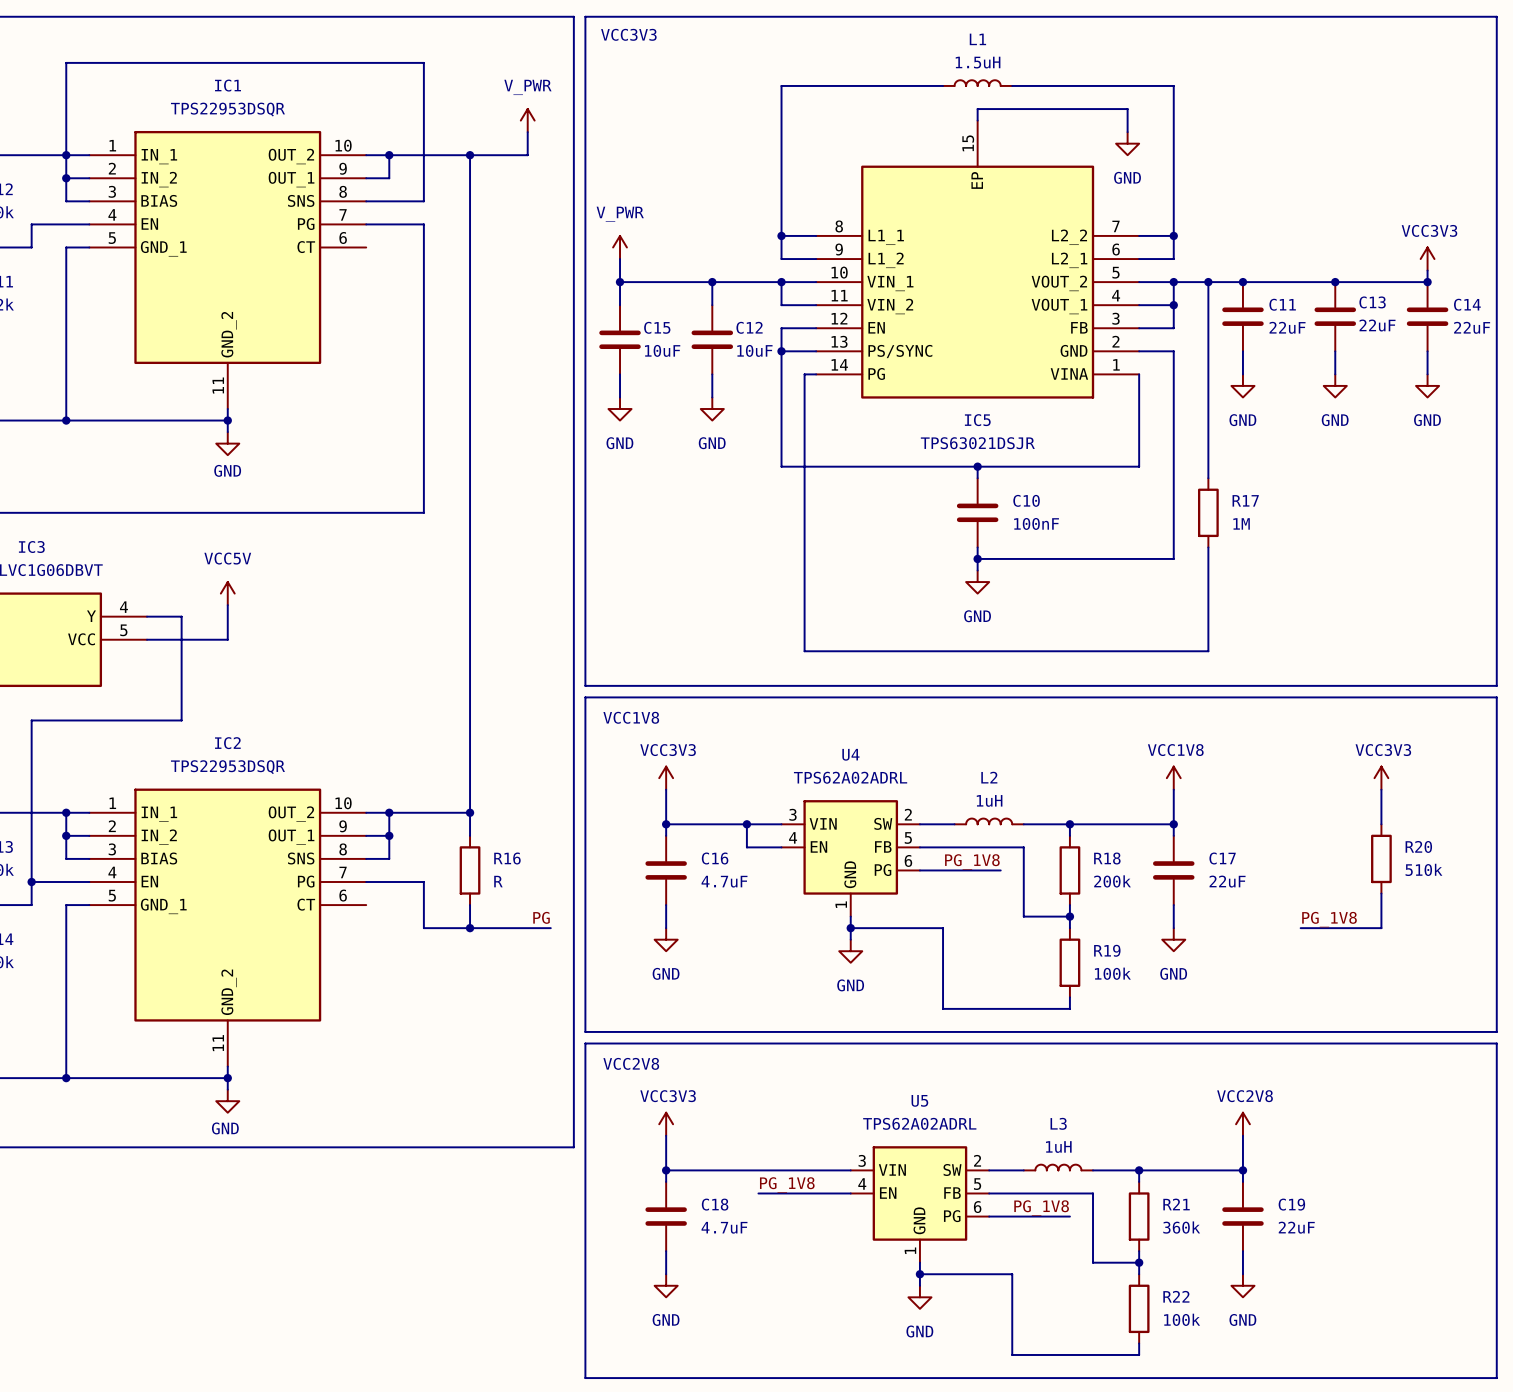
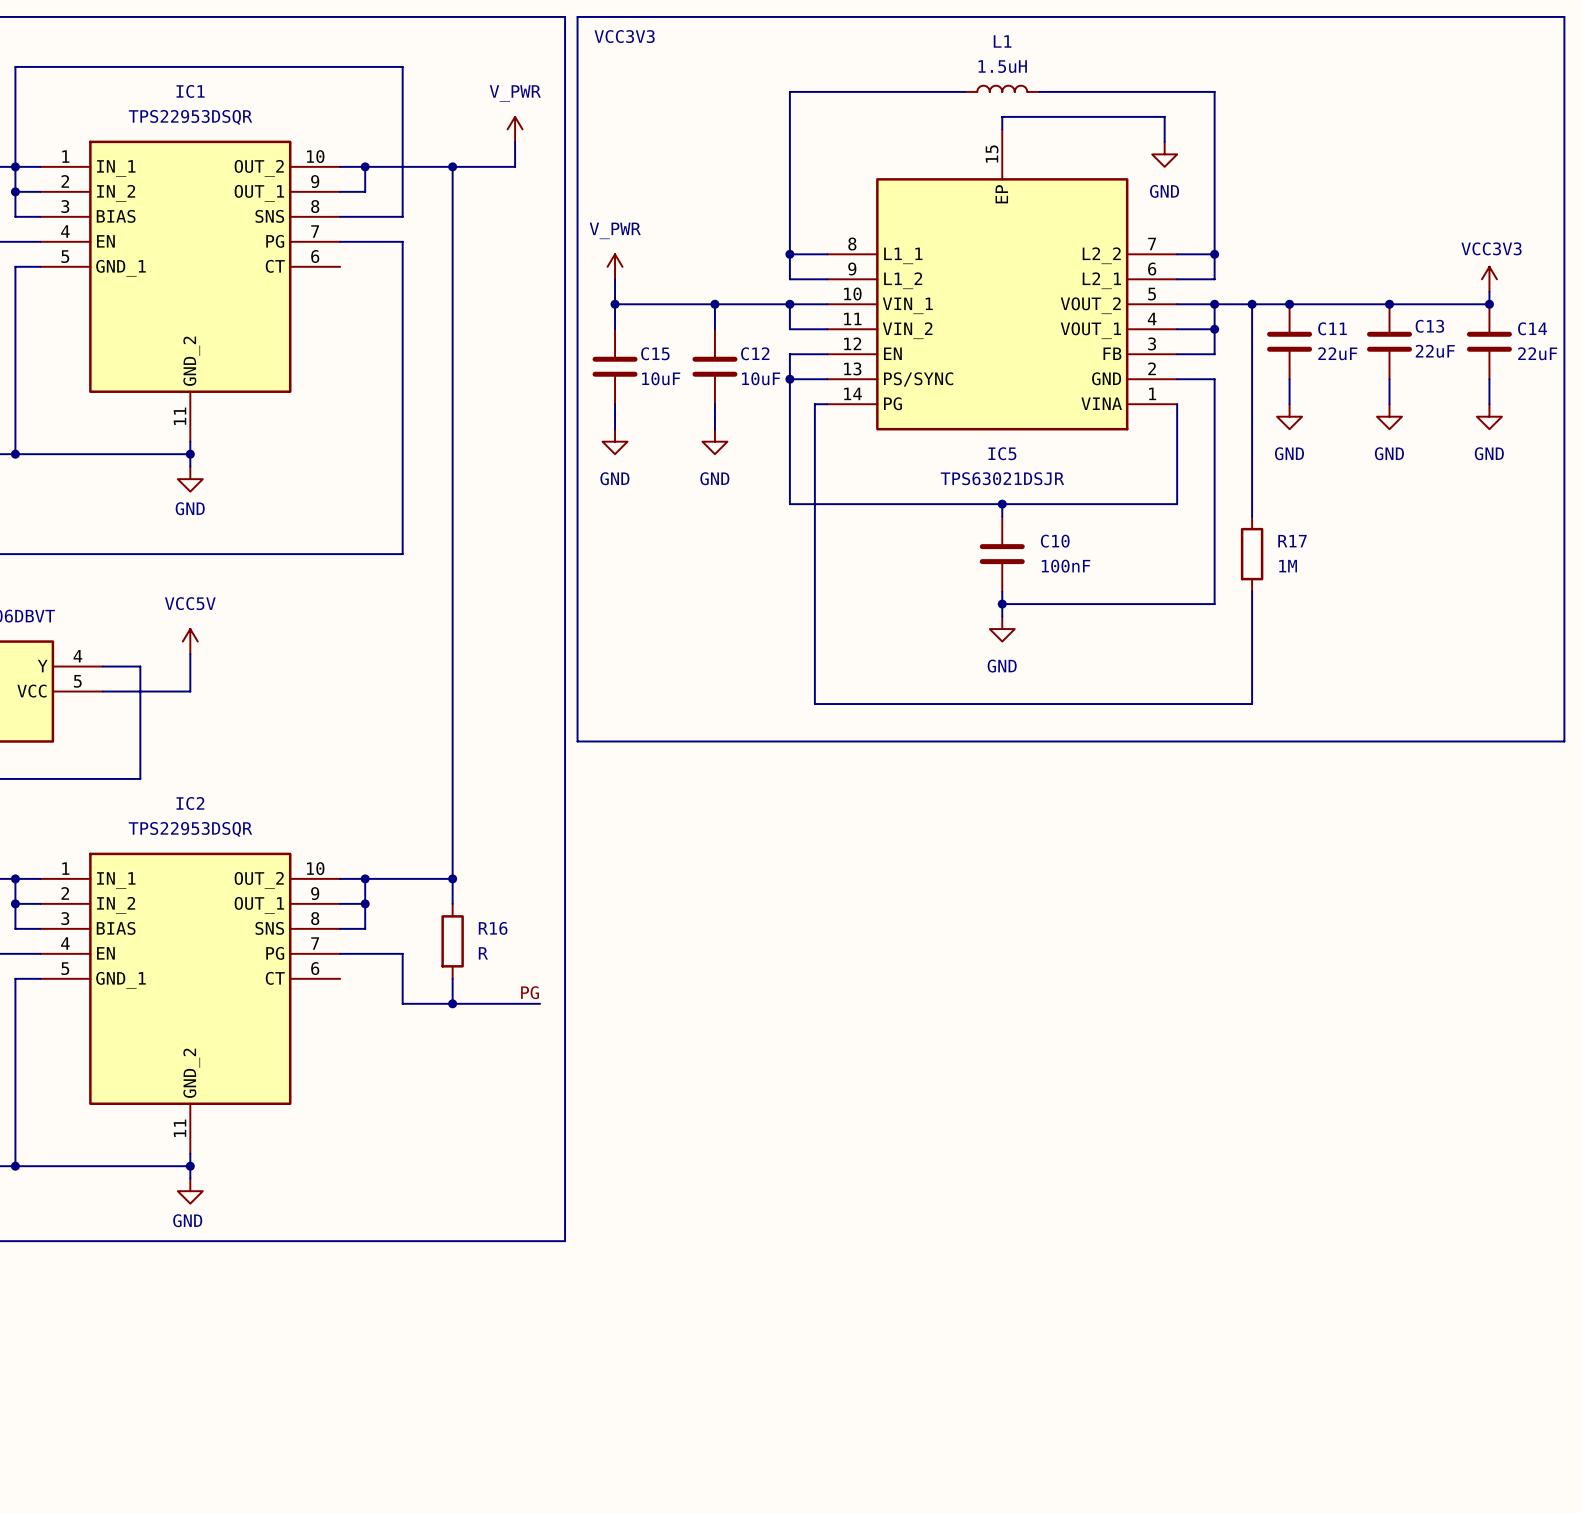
line: (585, 697) (1496, 697) (1496, 1031) (585, 1031) (585, 697) -> none
text: VCC1V8 (631, 717) -> none
power symbol: VCC3V3 (666, 778) -> none
power symbol: VCC1V8 (1173, 778) -> none
power symbol: VCC3V3 (1381, 778) -> none
wire: (666, 789) (666, 835) -> none
wire: (1173, 789) (1173, 835) -> none
wire: (1381, 789) (1381, 824) -> none
L2: 1uH (989, 821) -> none
wire: (666, 824) (781, 824) -> none
junction: (666, 824) -> none
wire: (746, 824) (746, 847) (781, 847) -> none
junction: (746, 824) -> none
wire: (919, 824) (954, 824) -> none
wire: (1023, 824) (1173, 824) -> none
wire: (1069, 824) (1069, 835) -> none
junction: (1069, 824) -> none
junction: (1173, 824) -> none
wire: (919, 847) (1023, 847) (1023, 916) (1069, 916) -> none
U4: TPS62A02ADRL (850, 858) -> none
R20: 510k (1381, 858) -> none
label: PG_1V8 (972, 861) -> none
C16: 4.7uF (666, 870) -> none
wire: (919, 870) (1000, 870) -> none
R18: 200k (1069, 870) -> none
C17: 22uF (1173, 870) -> none
wire: (1381, 893) (1381, 928) (1300, 928) -> none
wire: (666, 905) (666, 928) -> none
wire: (1069, 905) (1069, 928) -> none
wire: (1173, 905) (1173, 928) -> none
wire: (850, 916) (850, 939) -> none
junction: (1069, 916) -> none
label: PG_1V8 (1329, 919) -> none
wire: (850, 928) (943, 928) (943, 1008) (1069, 1008) (1069, 997) -> none
junction: (850, 928) -> none
power symbol: GND (666, 939) -> none
power symbol: GND (1173, 939) -> none
power symbol: GND (850, 951) -> none
R19: 100k (1069, 962) -> none
line: (585, 1043) (585, 1378) (1496, 1378) (1496, 1043) (585, 1043) -> none
text: VCC2V8 (631, 1063) -> none
power symbol: VCC3V3 (666, 1124) -> none
power symbol: VCC2V8 (1242, 1124) -> none
wire: (666, 1135) (666, 1181) -> none
wire: (1242, 1135) (1242, 1181) -> none
L3: 1uH (1058, 1167) -> none
wire: (666, 1170) (850, 1170) -> none
junction: (666, 1170) -> none
wire: (989, 1170) (1023, 1170) -> none
wire: (1093, 1170) (1242, 1170) -> none
wire: (1139, 1170) (1139, 1181) -> none
junction: (1139, 1170) -> none
junction: (1242, 1170) -> none
label: PG_1V8 (787, 1184) -> none
wire: (758, 1193) (850, 1193) -> none
wire: (989, 1193) (1093, 1193) (1093, 1262) (1139, 1262) -> none
U5: TPS62A02ADRL (919, 1204) -> none
label: PG_1V8 (1041, 1208) -> none
C18: 4.7uF (666, 1216) -> none
wire: (989, 1216) (1069, 1216) -> none
R21: 360k (1139, 1216) -> none
C19: 22uF (1242, 1216) -> none
wire: (666, 1251) (666, 1274) -> none
wire: (1139, 1251) (1139, 1274) -> none
wire: (1242, 1251) (1242, 1274) -> none
wire: (919, 1262) (919, 1285) -> none
junction: (1139, 1262) -> none
wire: (919, 1274) (1012, 1274) (1012, 1354) (1139, 1354) (1139, 1343) -> none
junction: (919, 1274) -> none
power symbol: GND (666, 1285) -> none
power symbol: GND (1242, 1285) -> none
power symbol: GND (919, 1297) -> none
R22: 100k (1139, 1308) -> none

